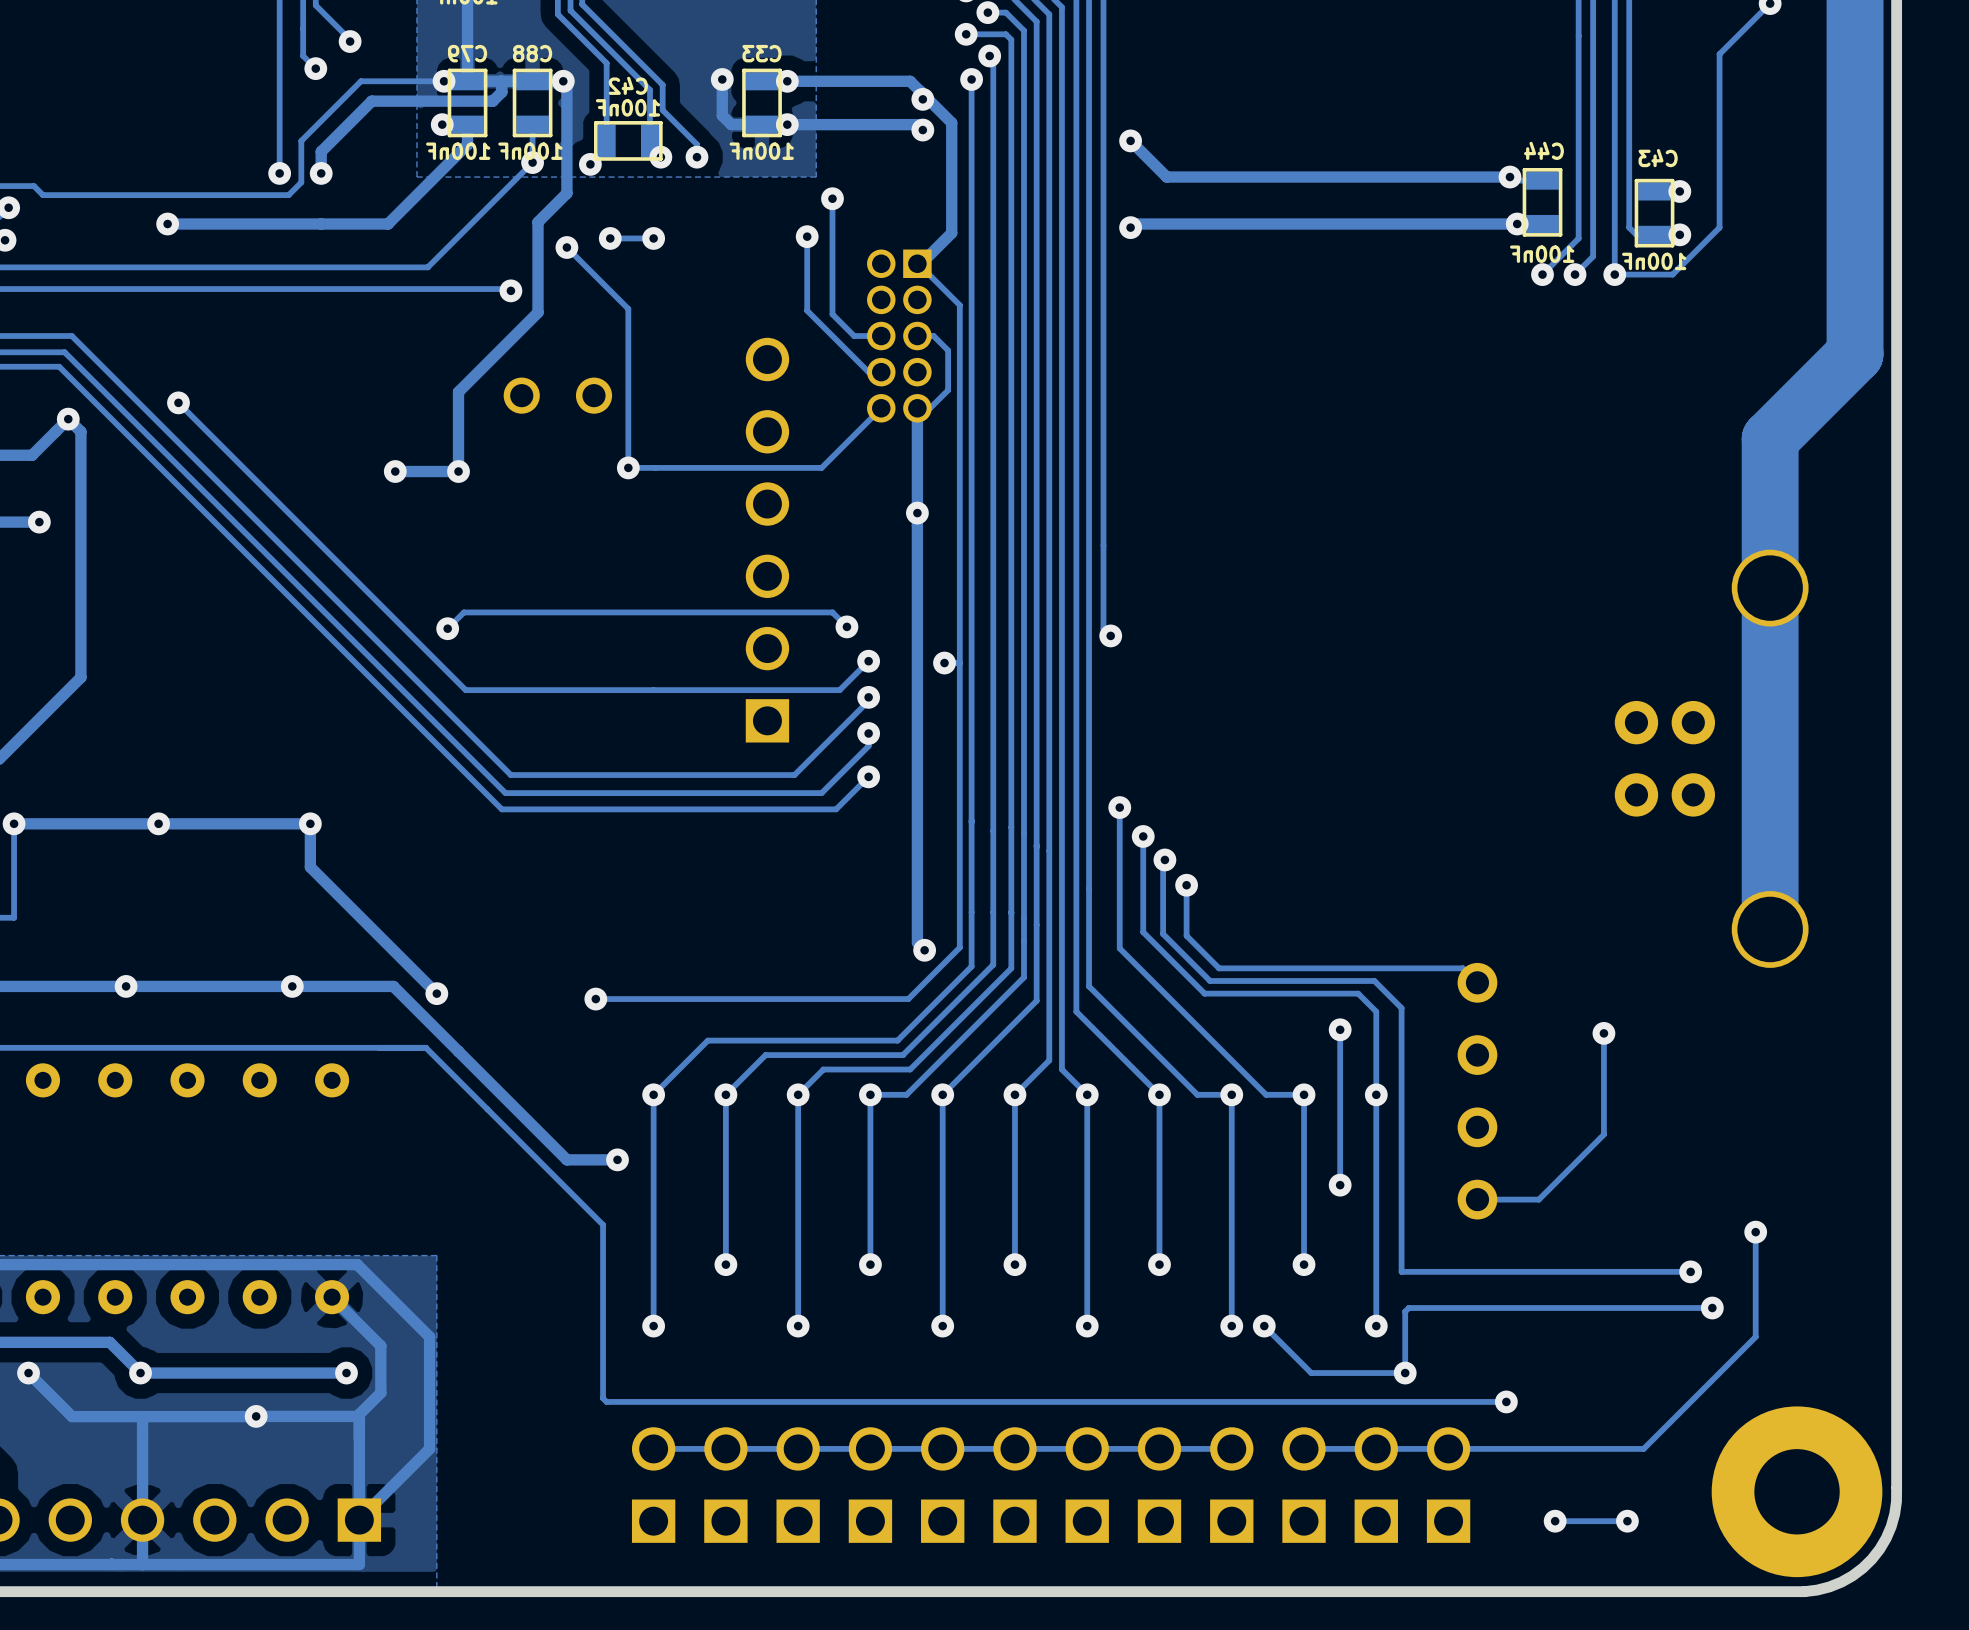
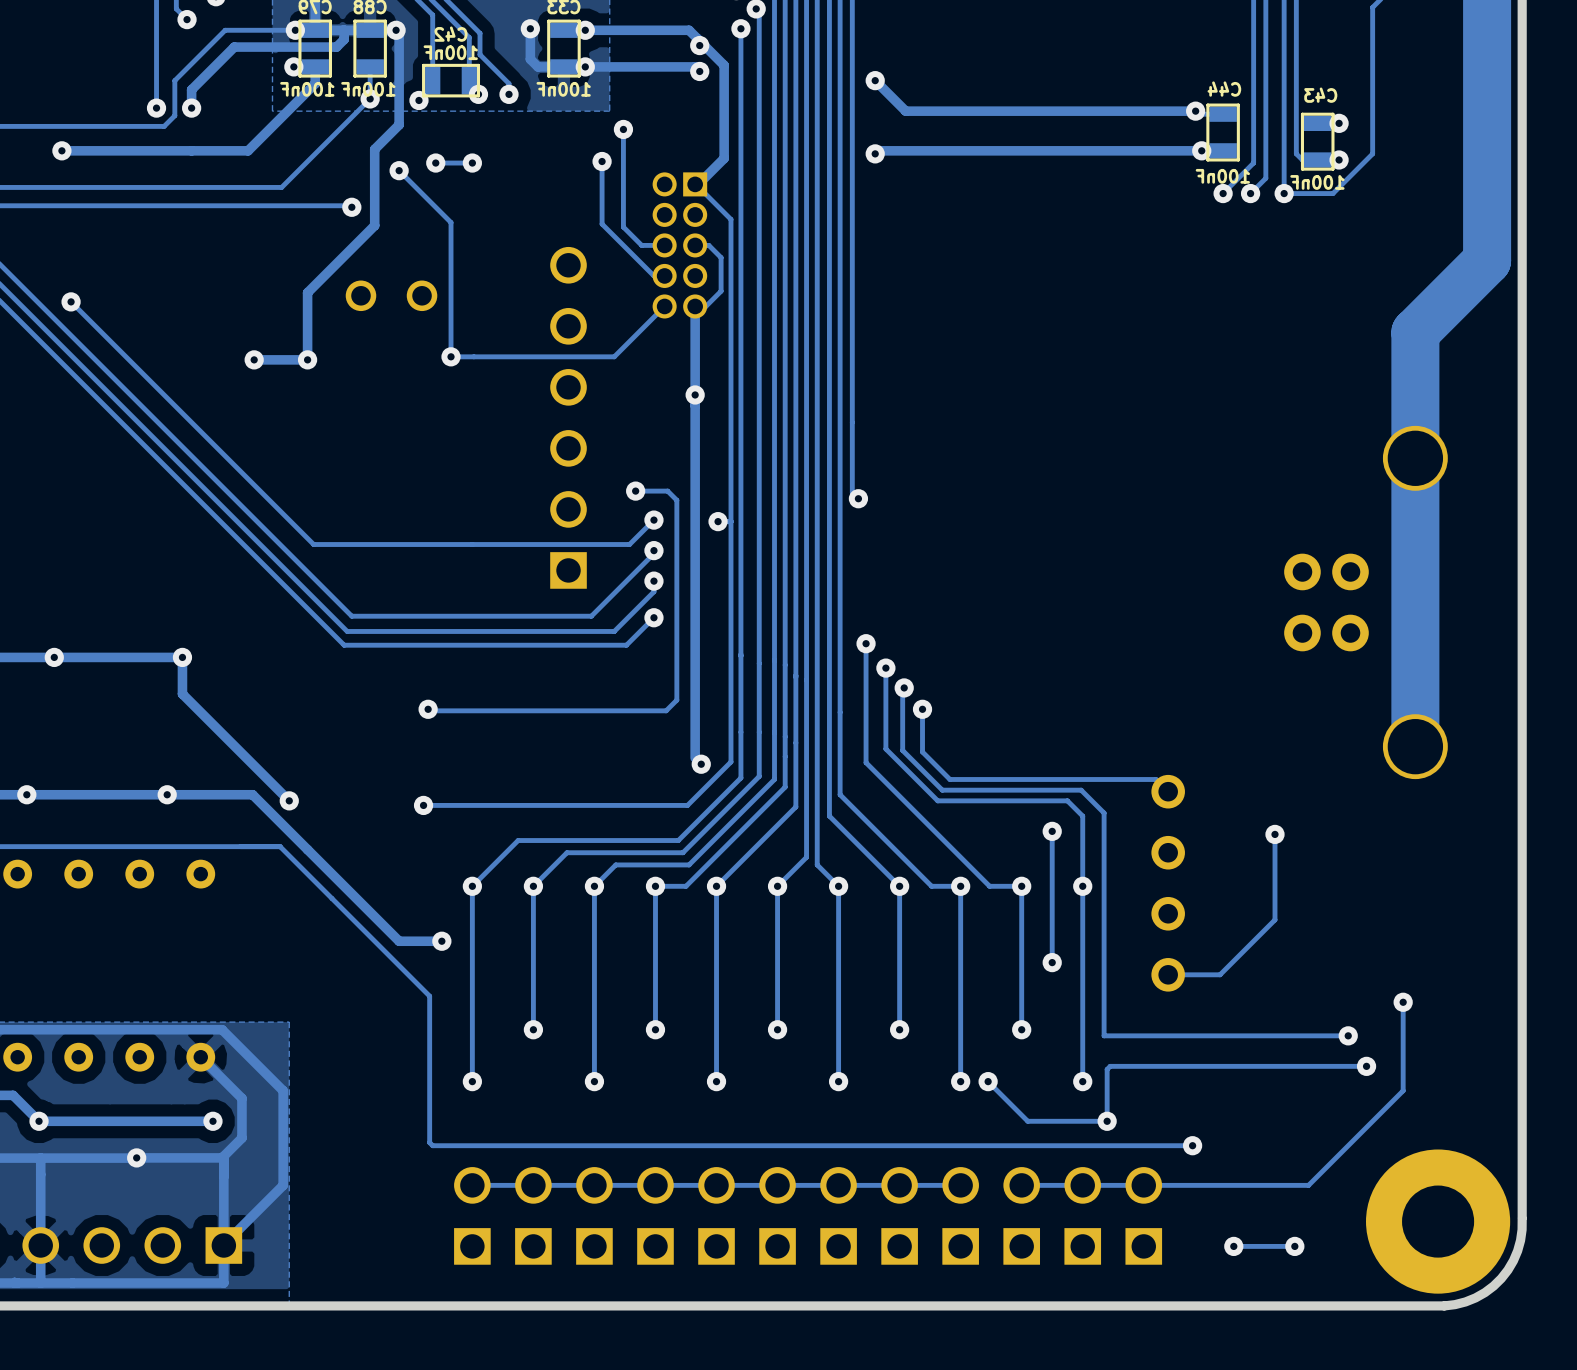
track: (846, 626) (832, 612) (463, 612) (447, 628) -> (635, 491) (667, 491) (676, 500) (676, 700) (666, 710) (429, 710) (428, 709)
via: (447, 628) -> none
via: none -> (428, 709)

